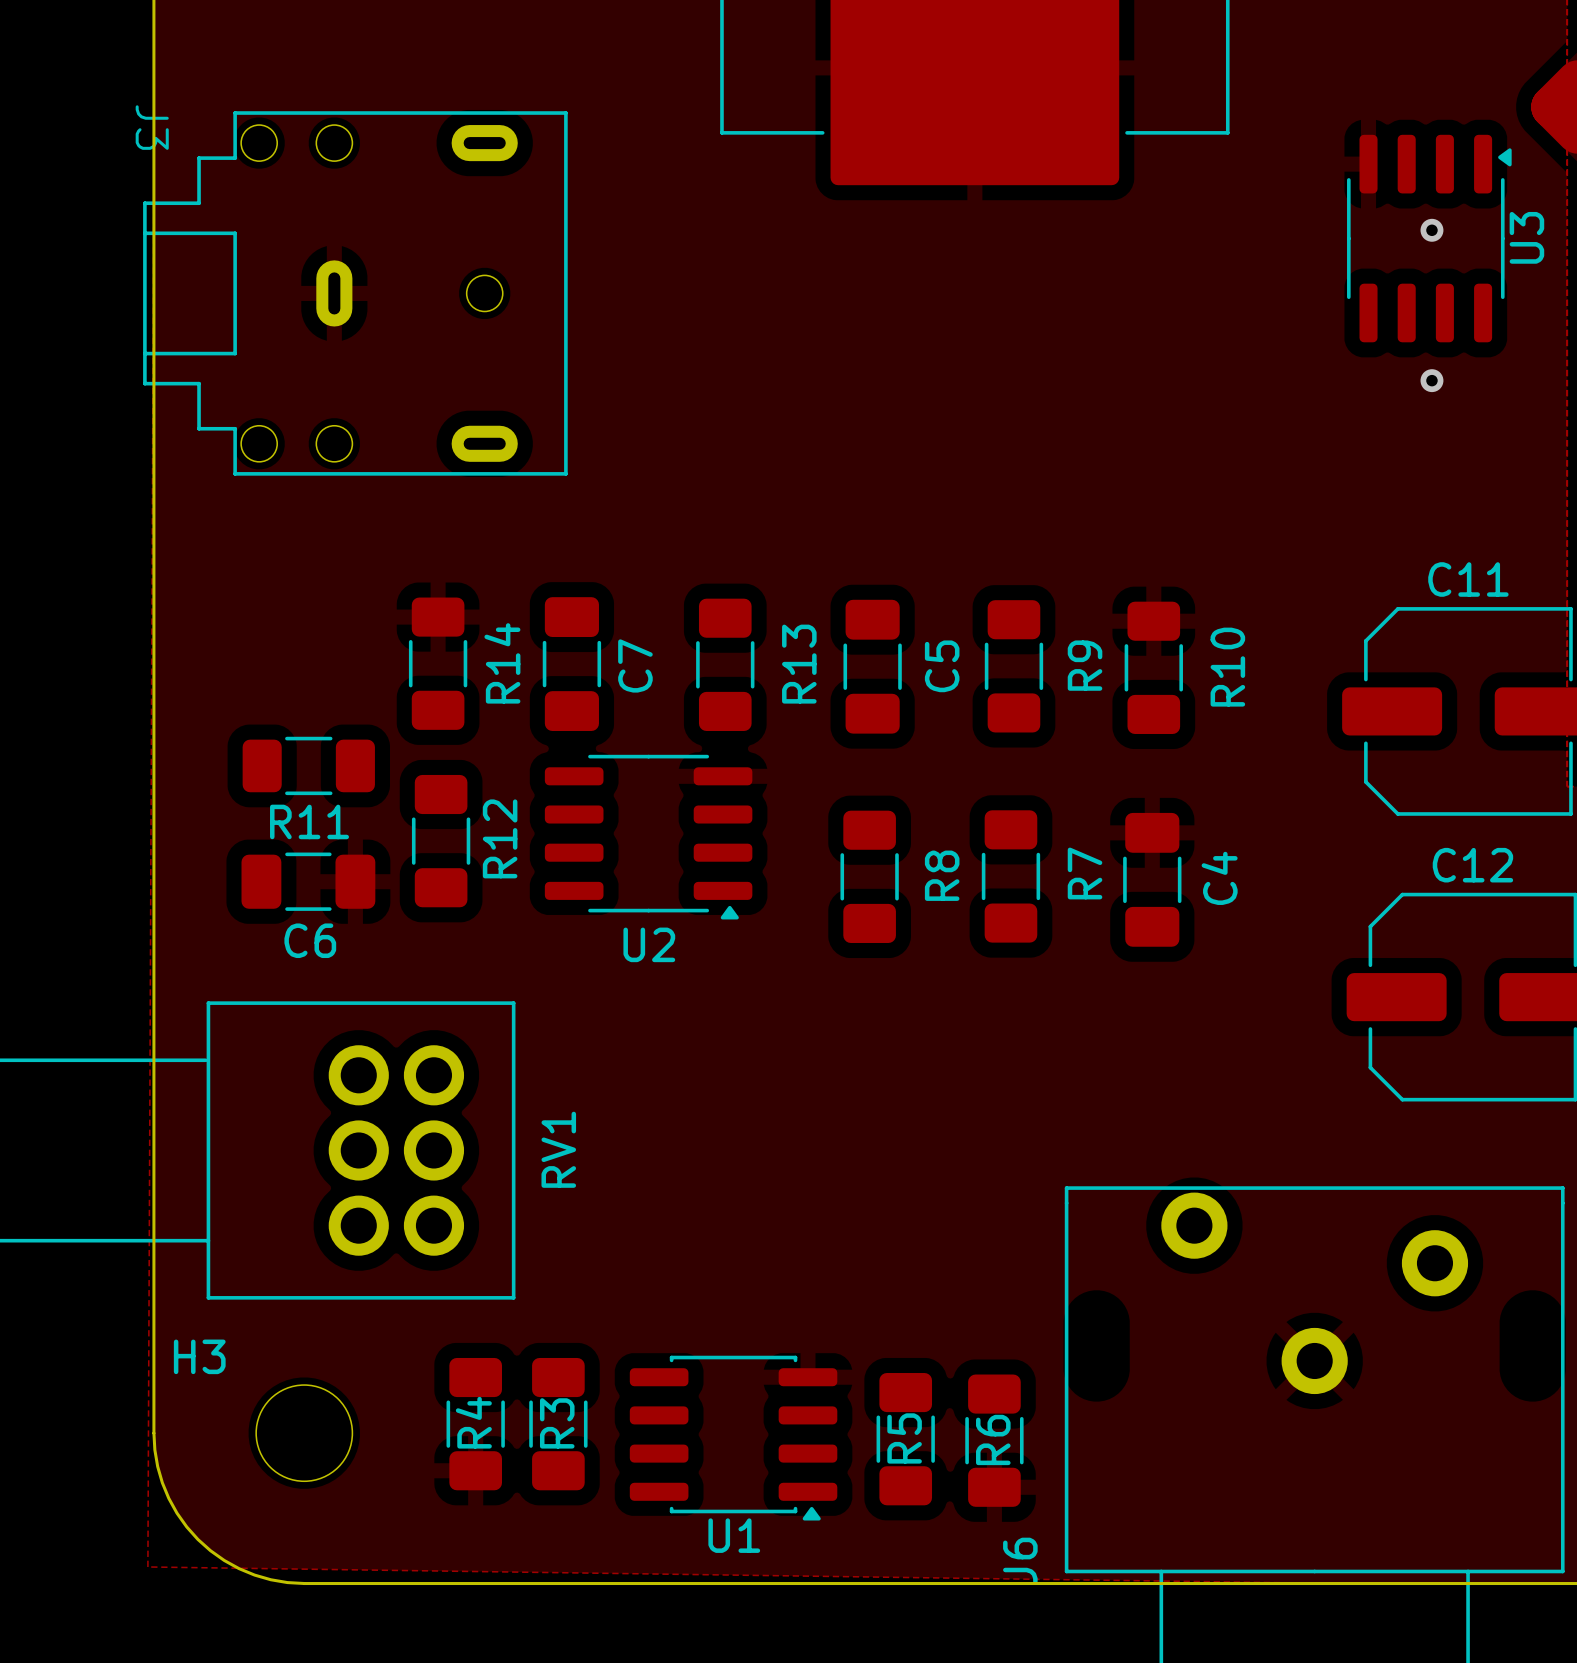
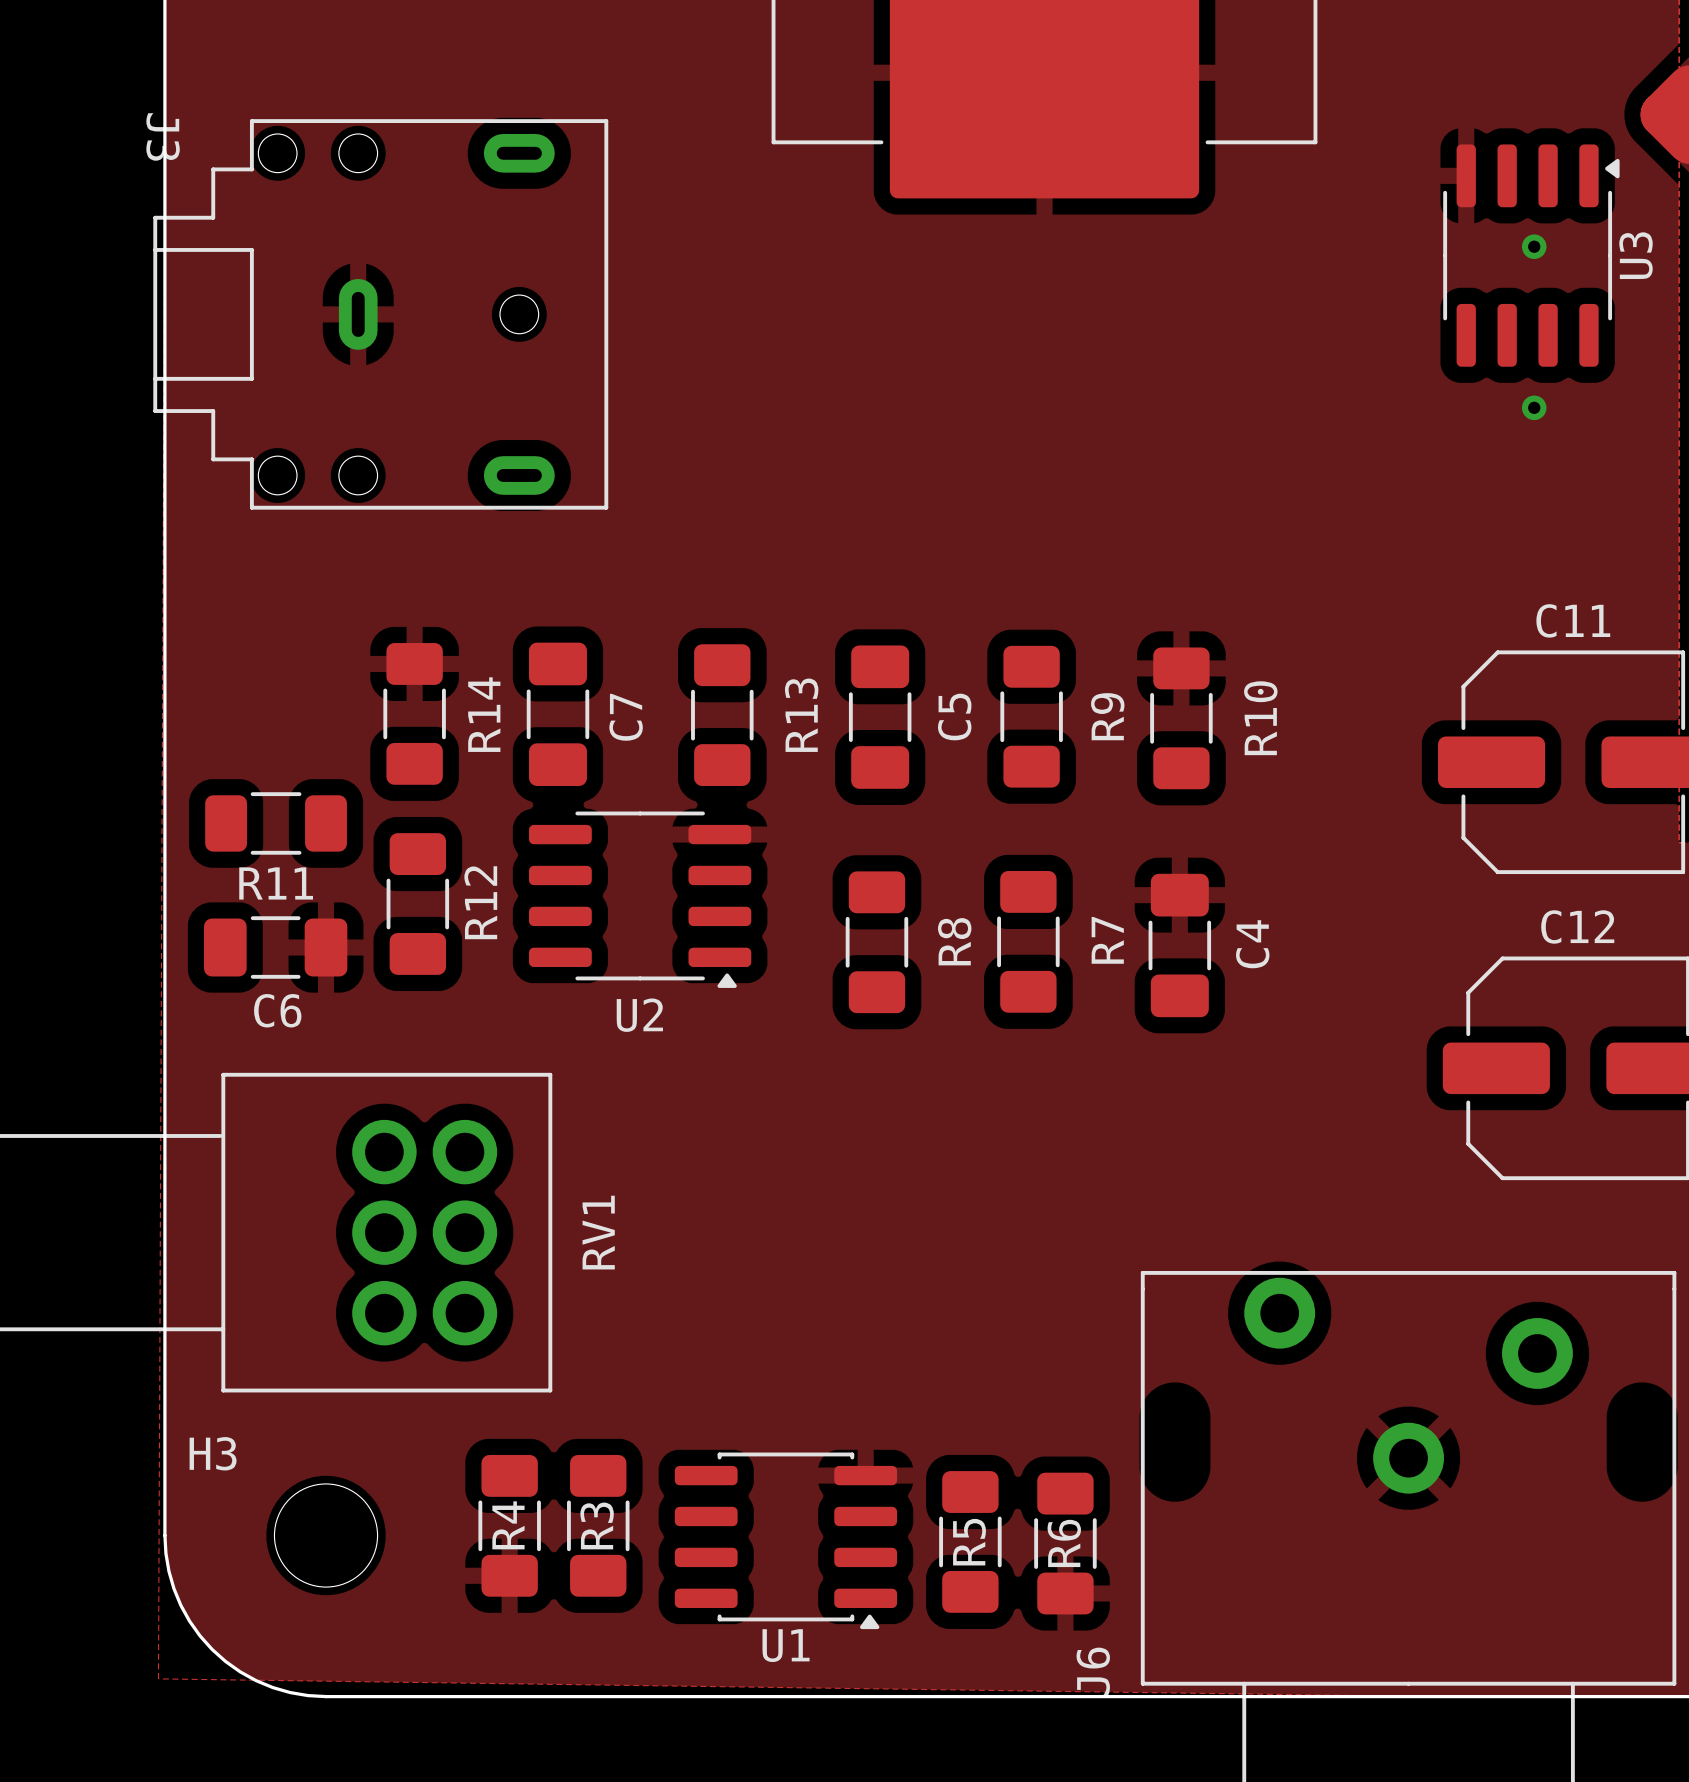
R14 position: (438, 663) -> (414, 713)
C7 position: (571, 664) -> (557, 714)
R13 position: (725, 664) -> (722, 715)
C5 position: (872, 666) -> (880, 717)
R9 position: (1013, 666) -> (1031, 716)
R10 position: (1153, 667) -> (1181, 718)
R11 position: (308, 765) -> (276, 823)
U2 position: (648, 837) -> (640, 899)
R12 position: (441, 841) -> (417, 904)
R8 position: (869, 876) -> (876, 942)
R7 position: (1010, 876) -> (1028, 941)
C4 position: (1152, 879) -> (1179, 945)
C6 position: (308, 881) -> (275, 947)

